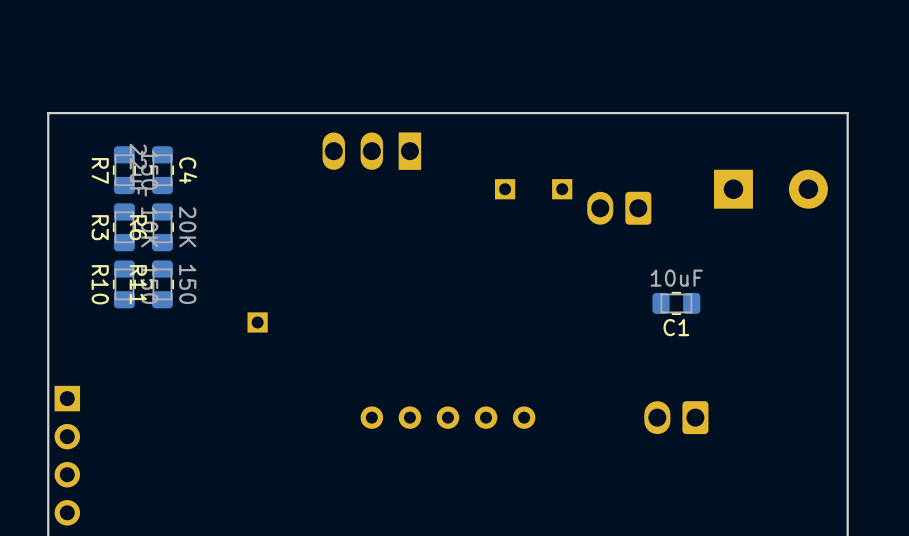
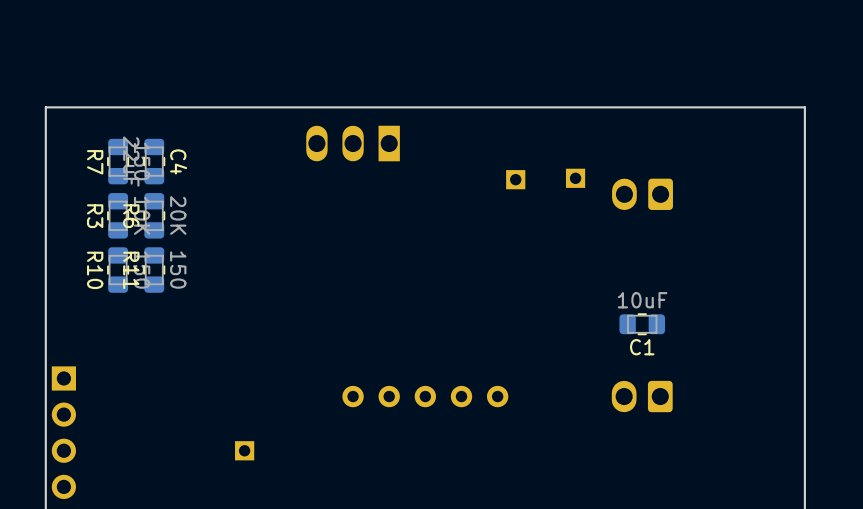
part: none -> (575, 178)
part: (505, 189) -> none
part: none -> (515, 179)
part: (562, 189) -> none
part: (770, 189) -> none
part position: (619, 208) -> (642, 194)
C1 position: (676, 303) -> (642, 324)
part position: (257, 322) -> (244, 450)

